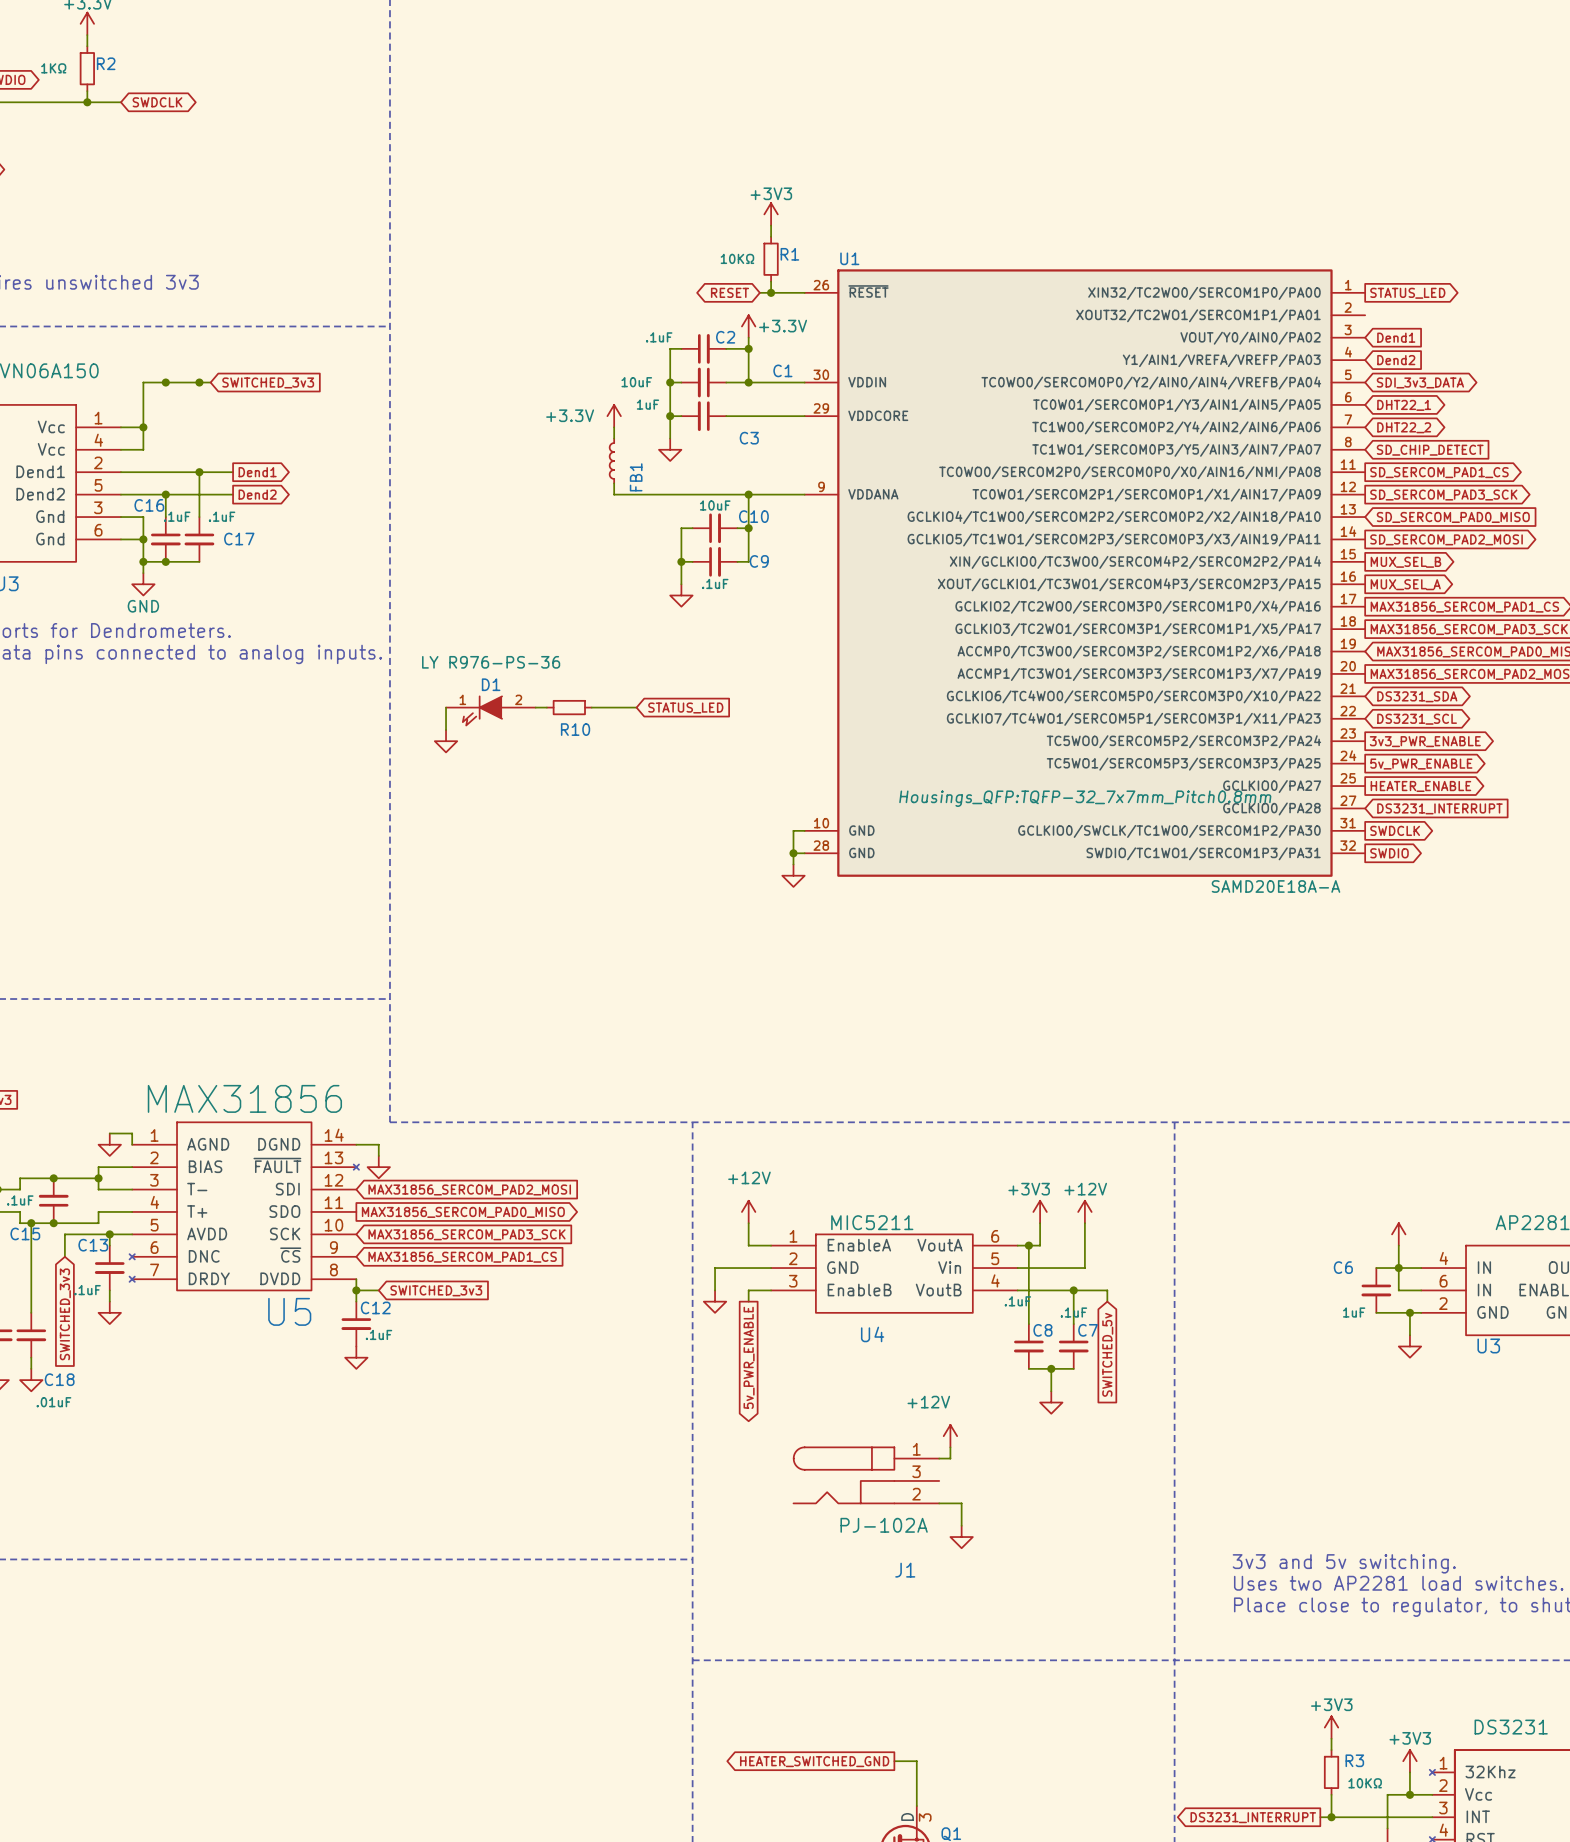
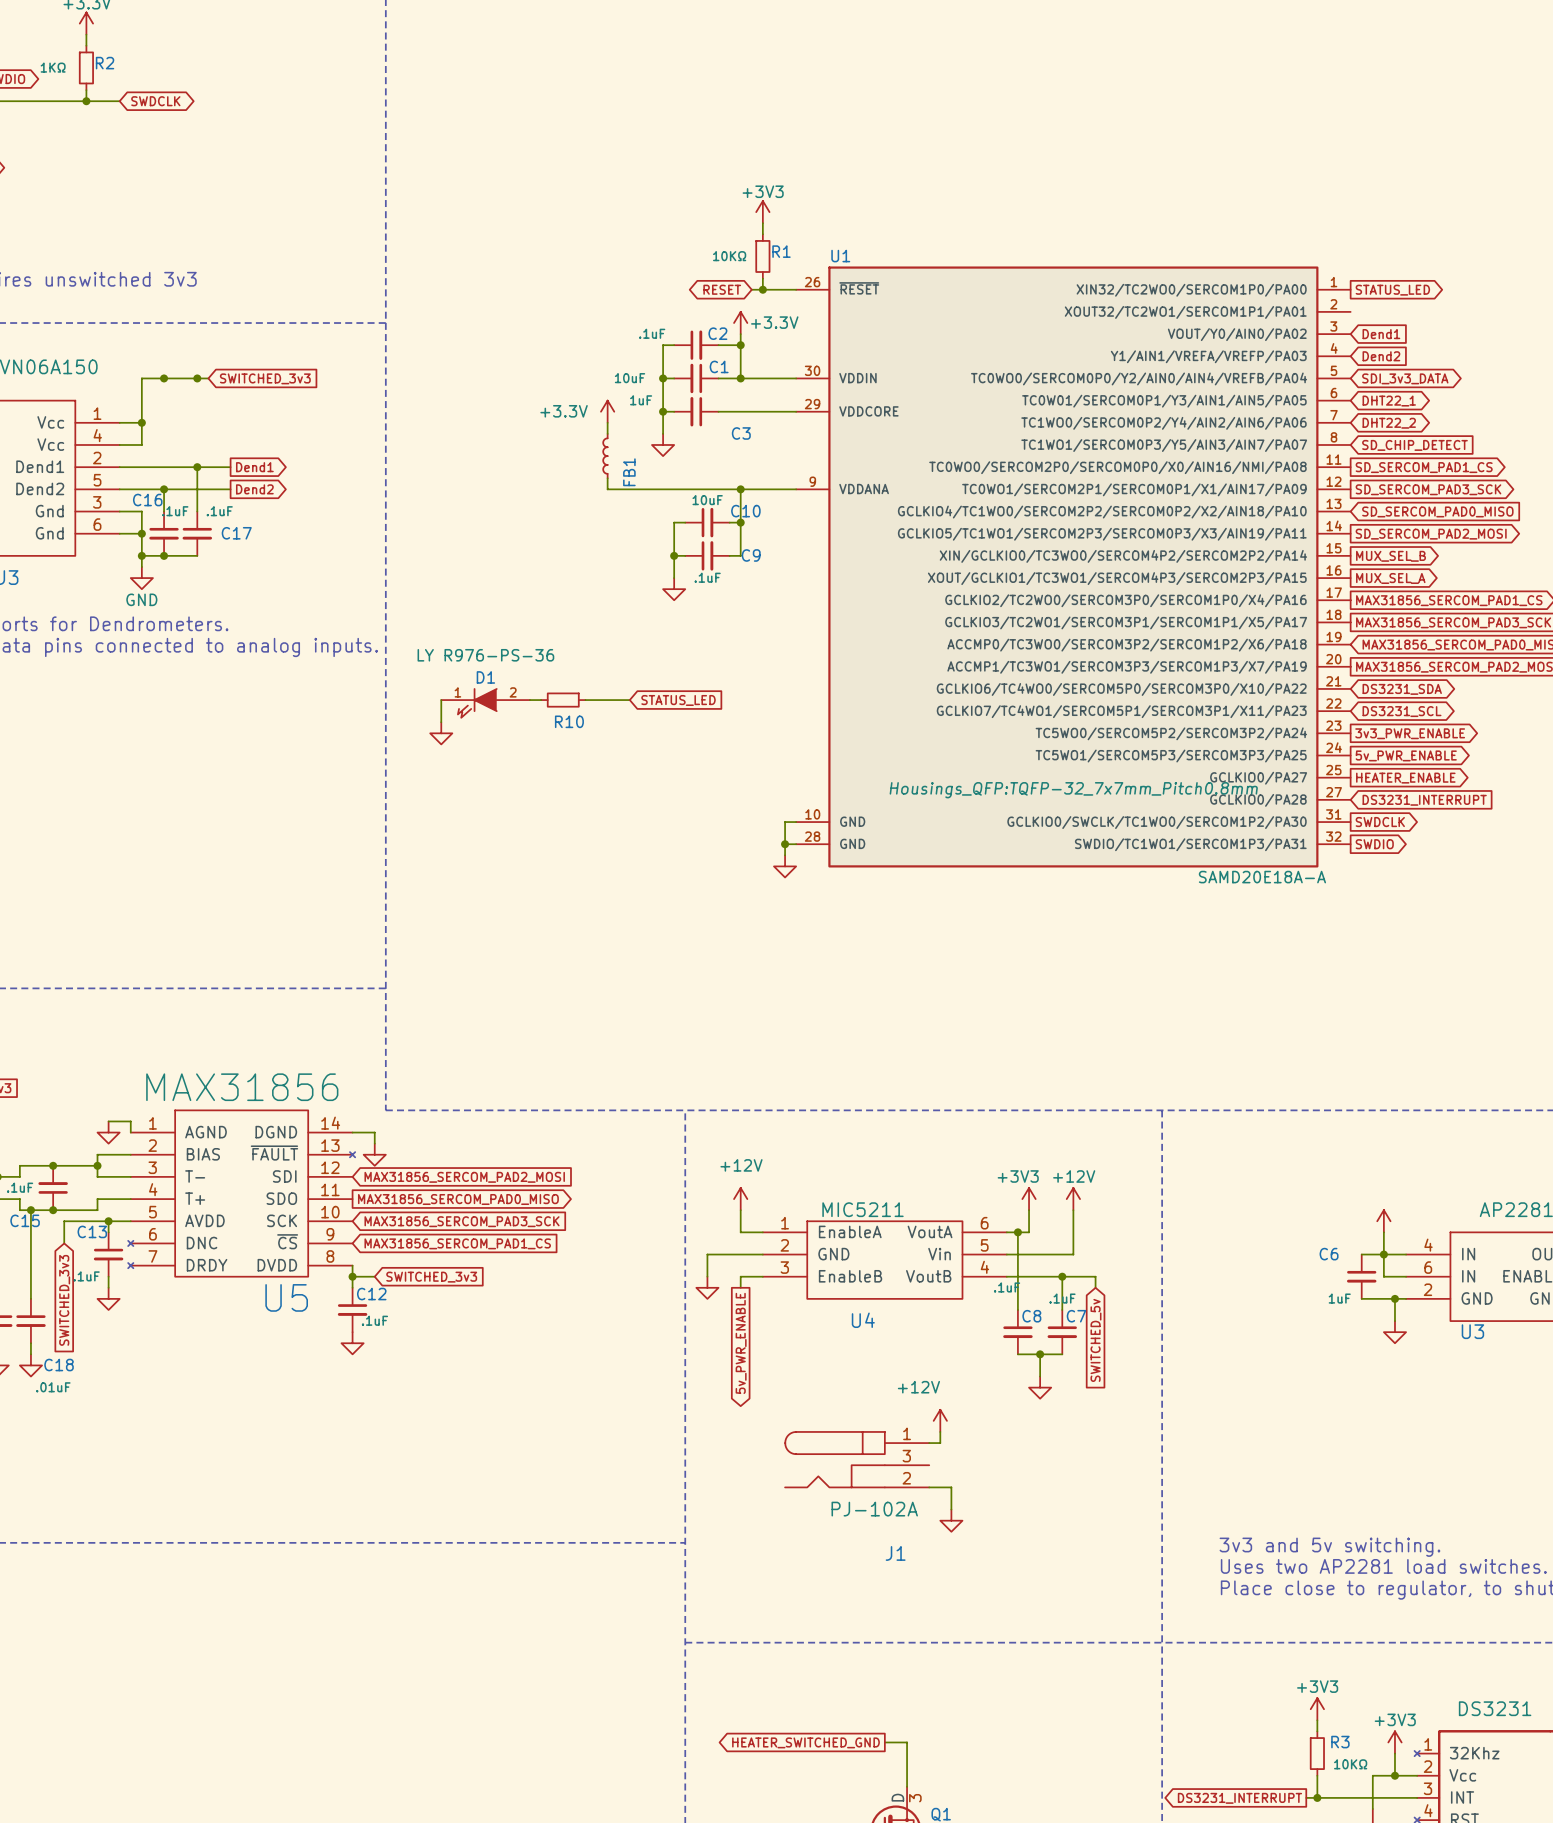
C1 name position: C1 (782, 370) -> C1 (719, 366)

